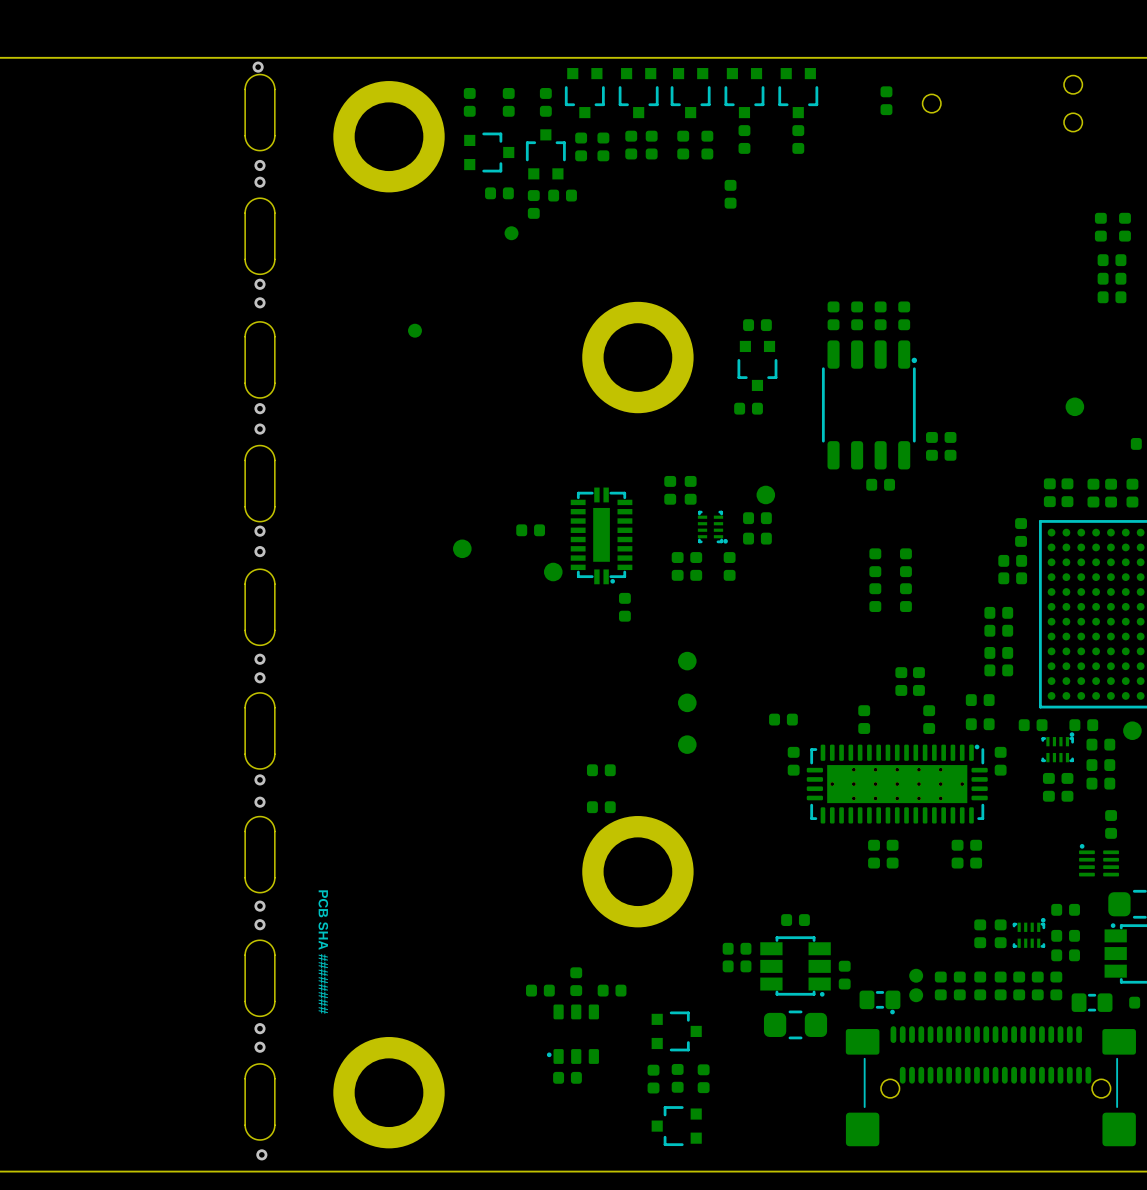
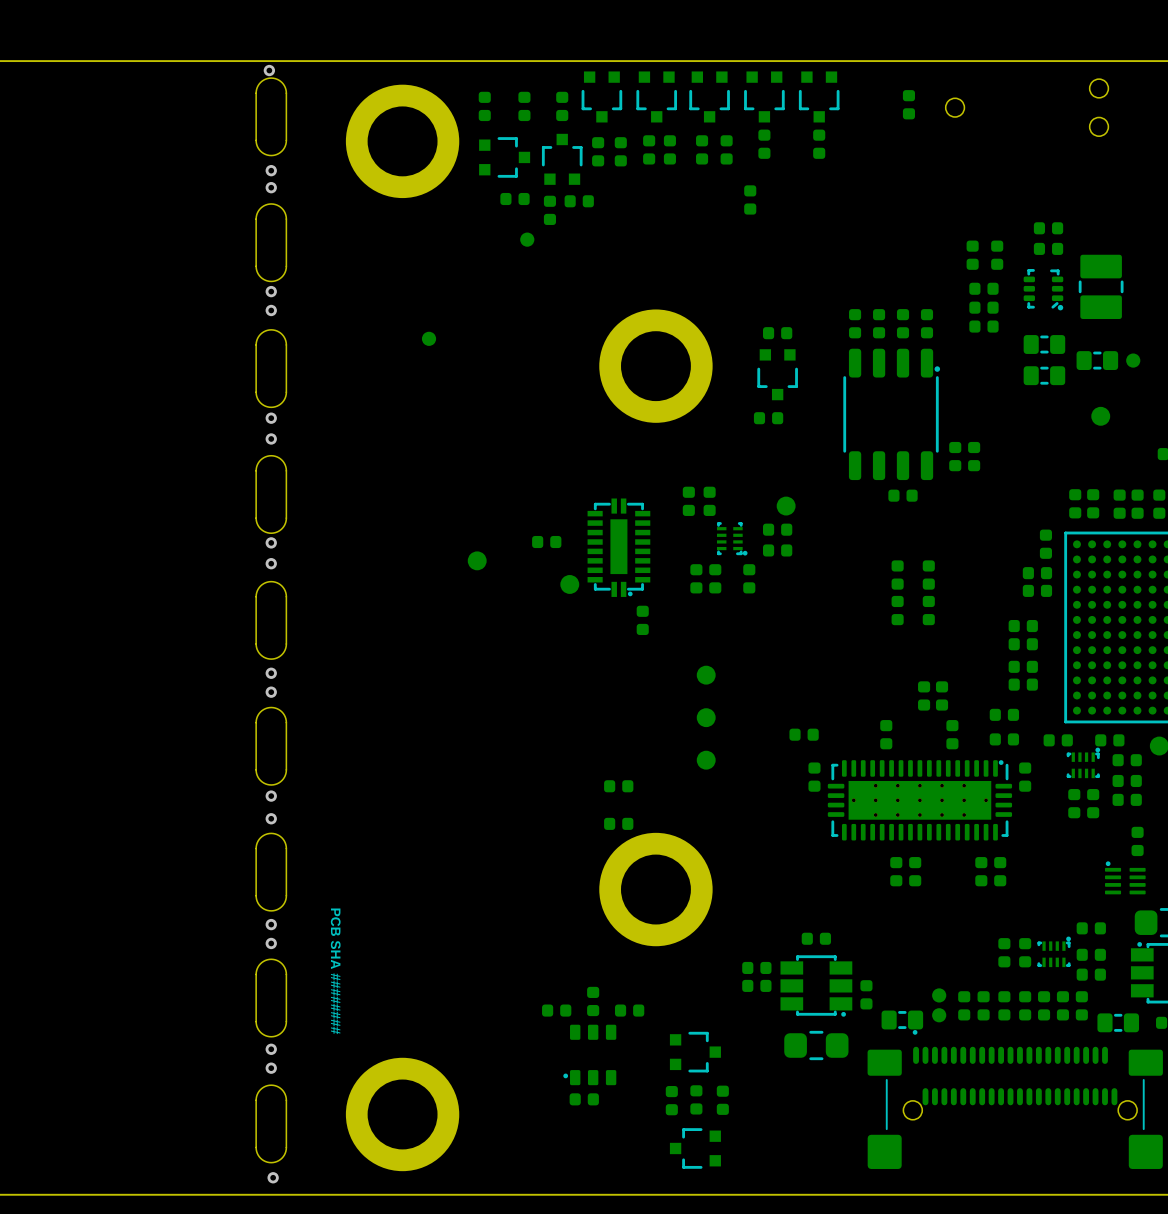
part: none -> (1048, 228)
part: (1100, 227) -> none
part: (1125, 227) -> none
part: none -> (1048, 248)
part: none -> (972, 255)
part: none -> (997, 255)
part: (1112, 260) -> none
part: (1112, 278) -> none
part: none -> (1101, 286)
part: none -> (983, 288)
part: none -> (1043, 289)
part: (1112, 297) -> none
part: none -> (983, 307)
part: none -> (983, 326)
part: none -> (1044, 344)
part: none -> (1097, 360)
part: none -> (1133, 360)
part: none -> (1044, 375)

